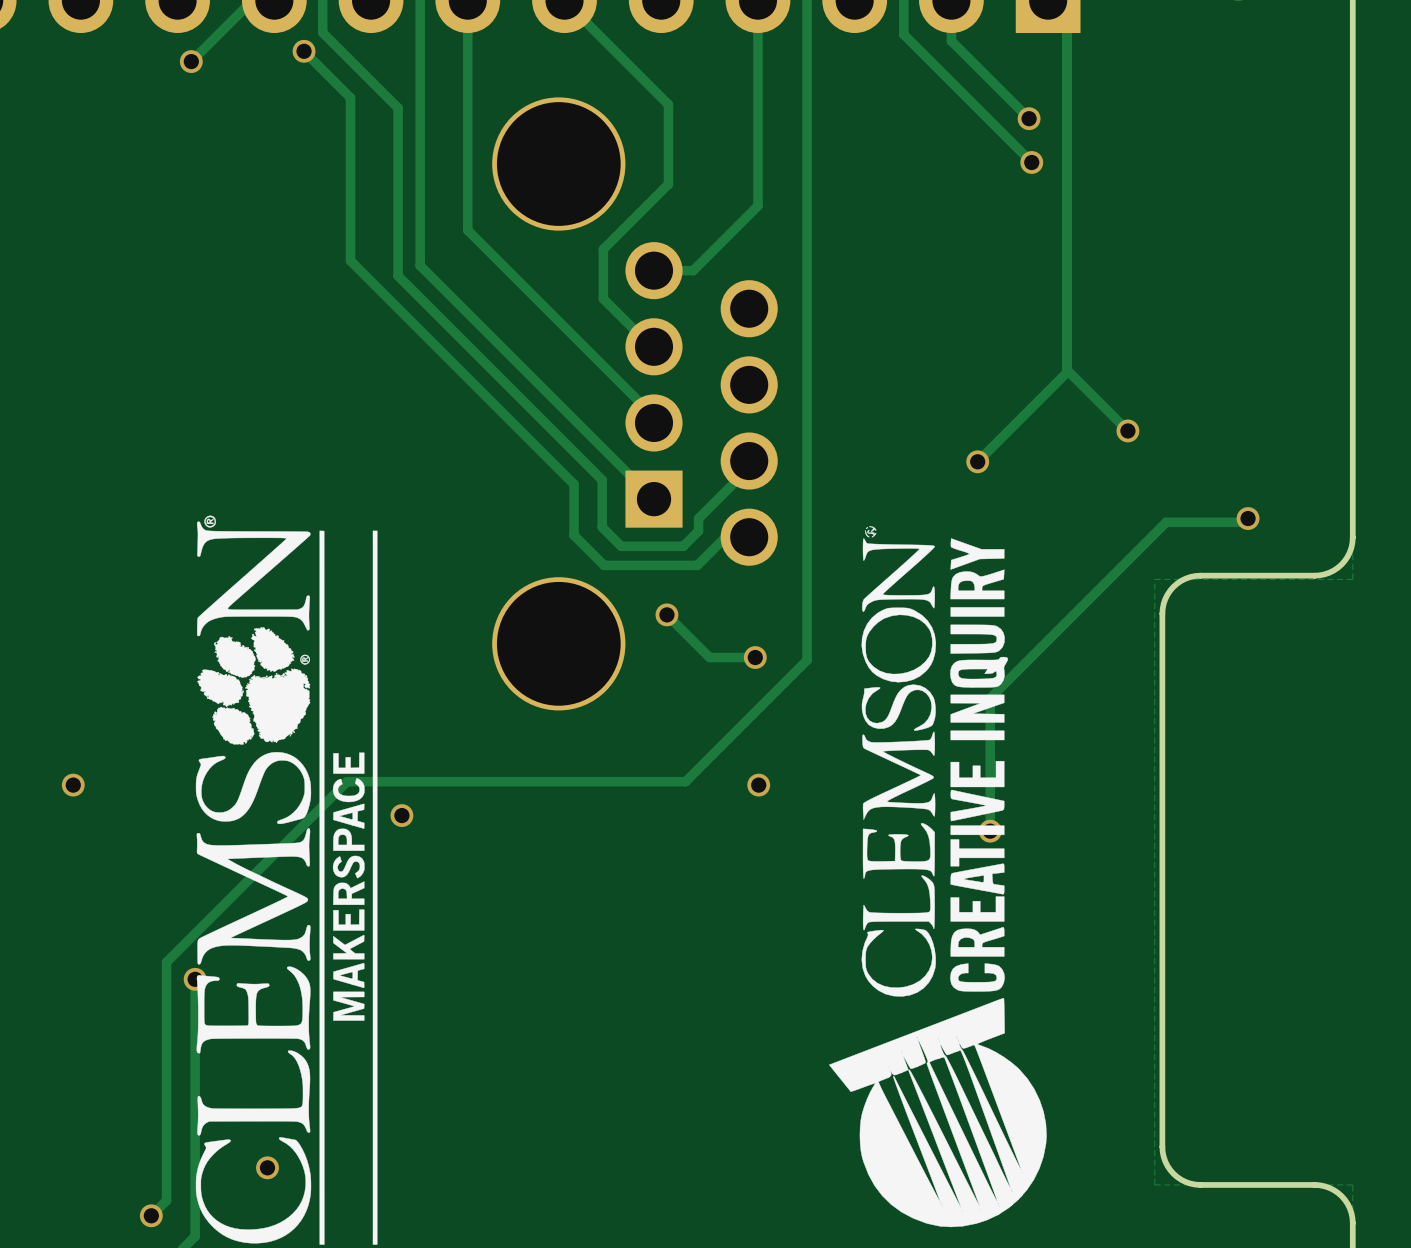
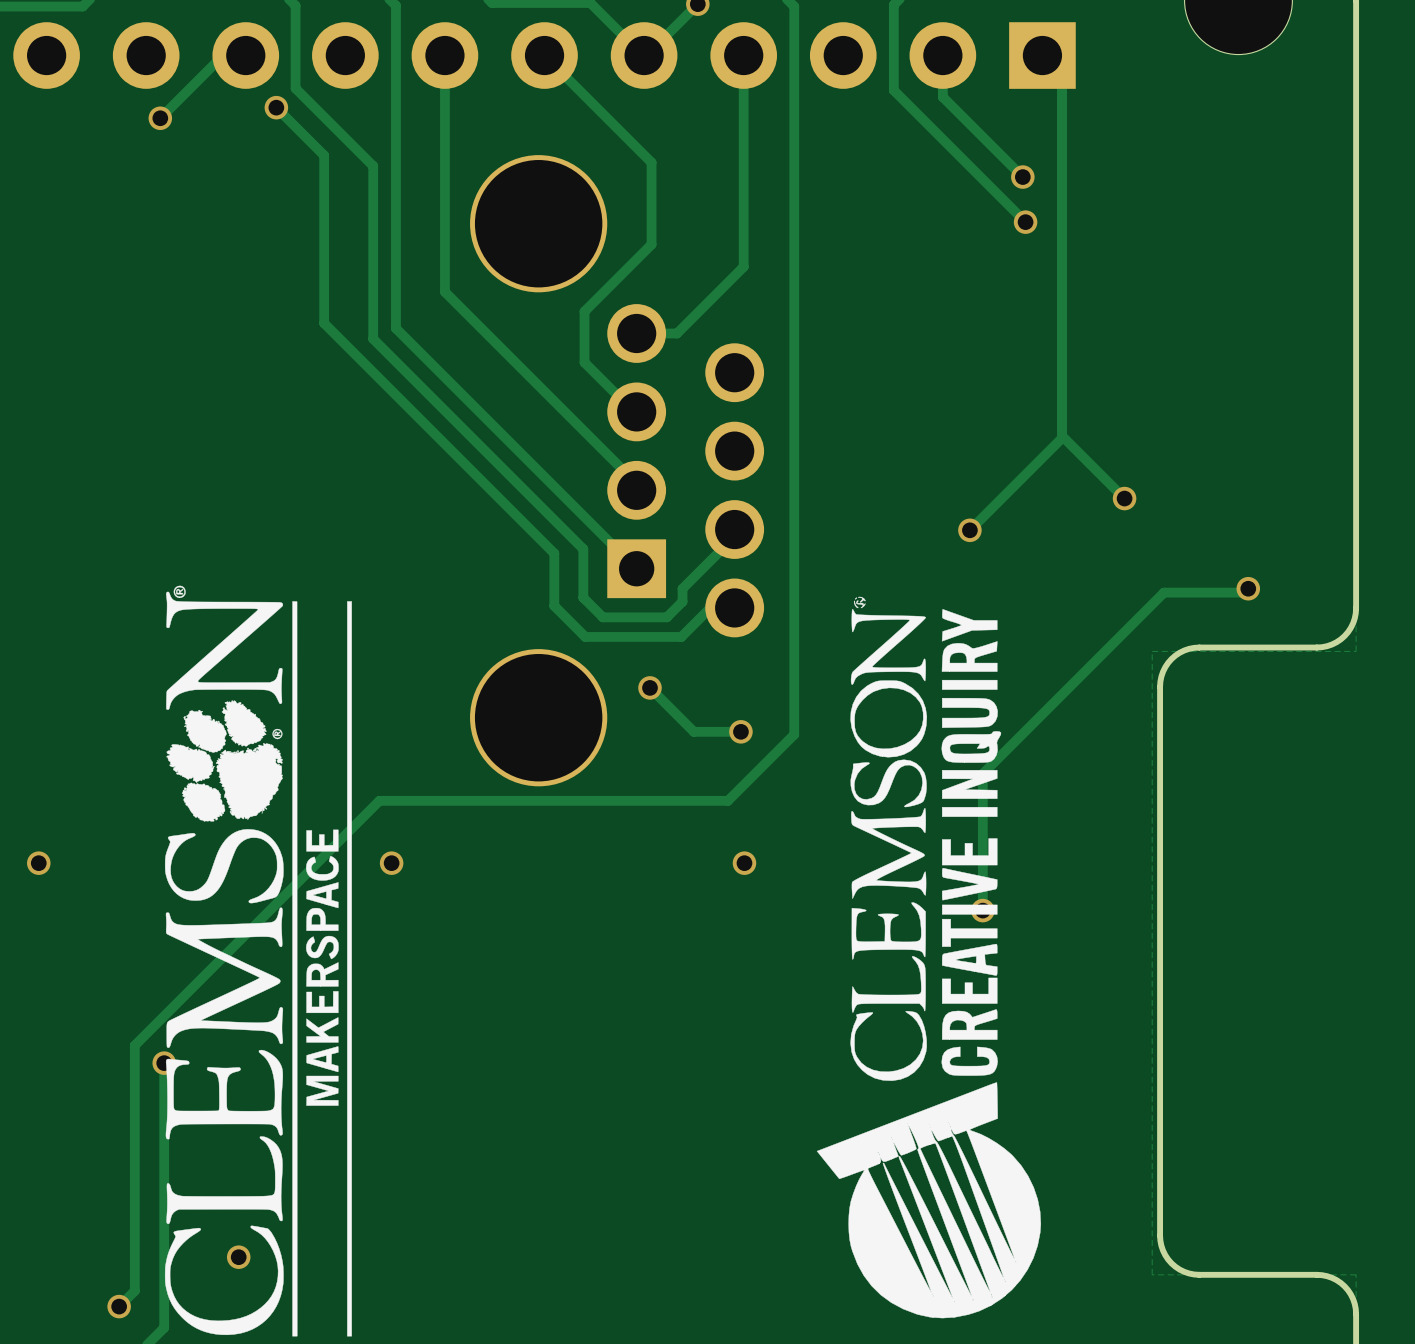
track: (742, 724) (685, 781) (347, 781) -> (728, 800) (379, 800) (320, 859)
via position: (401, 815) -> (391, 863)

